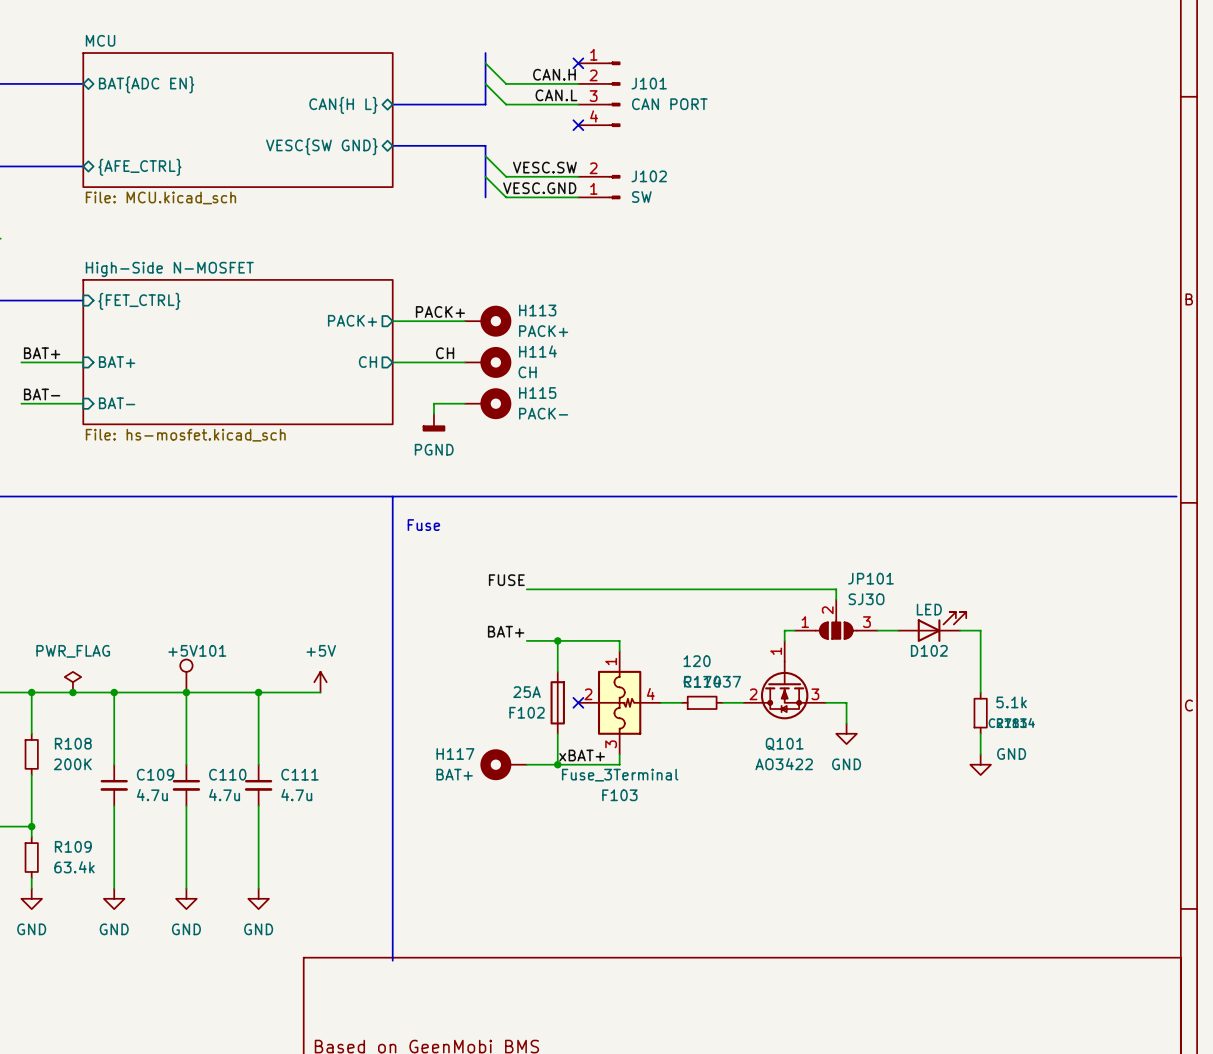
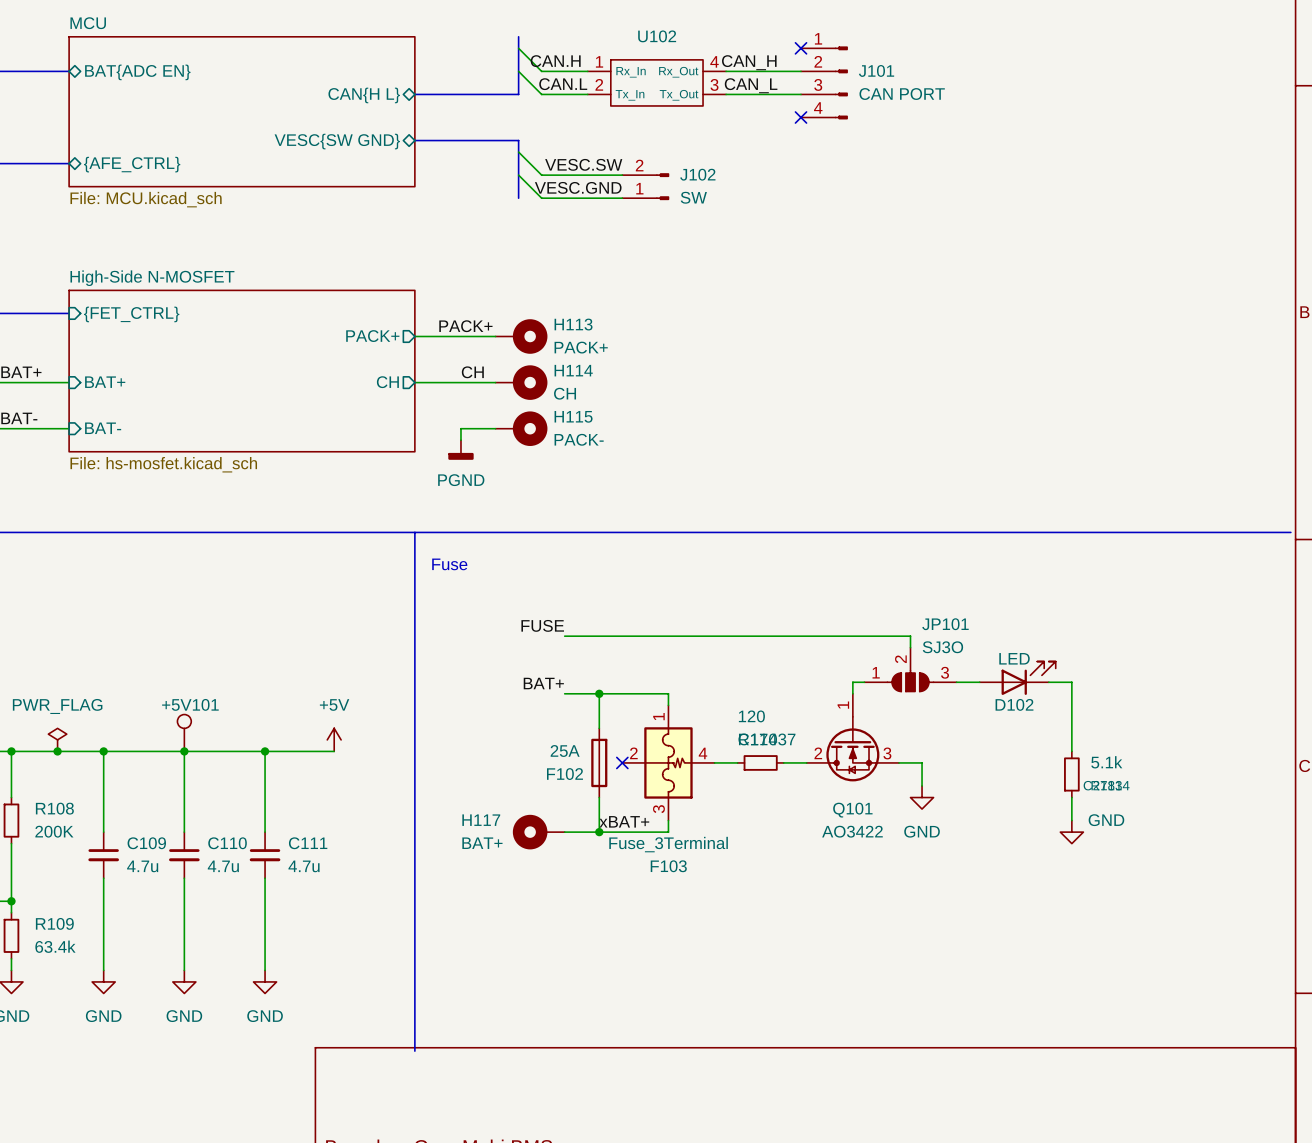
no-connect mark: (578, 63) -> none
no-connect mark: none -> (801, 48)
label position: CAN.H (554, 74) -> CAN.H (555, 61)
label: none -> CAN_H (749, 62)
wire: none -> (726, 71) (801, 71)
J101 position: (599, 94) -> (824, 82)
U102: none -> (656, 82)
label position: CAN.L (556, 95) -> CAN.L (563, 84)
label: none -> CAN_L (751, 85)
wire: none -> (726, 94) (801, 94)
no-connect mark: (578, 125) -> none
no-connect mark: none -> (801, 117)

